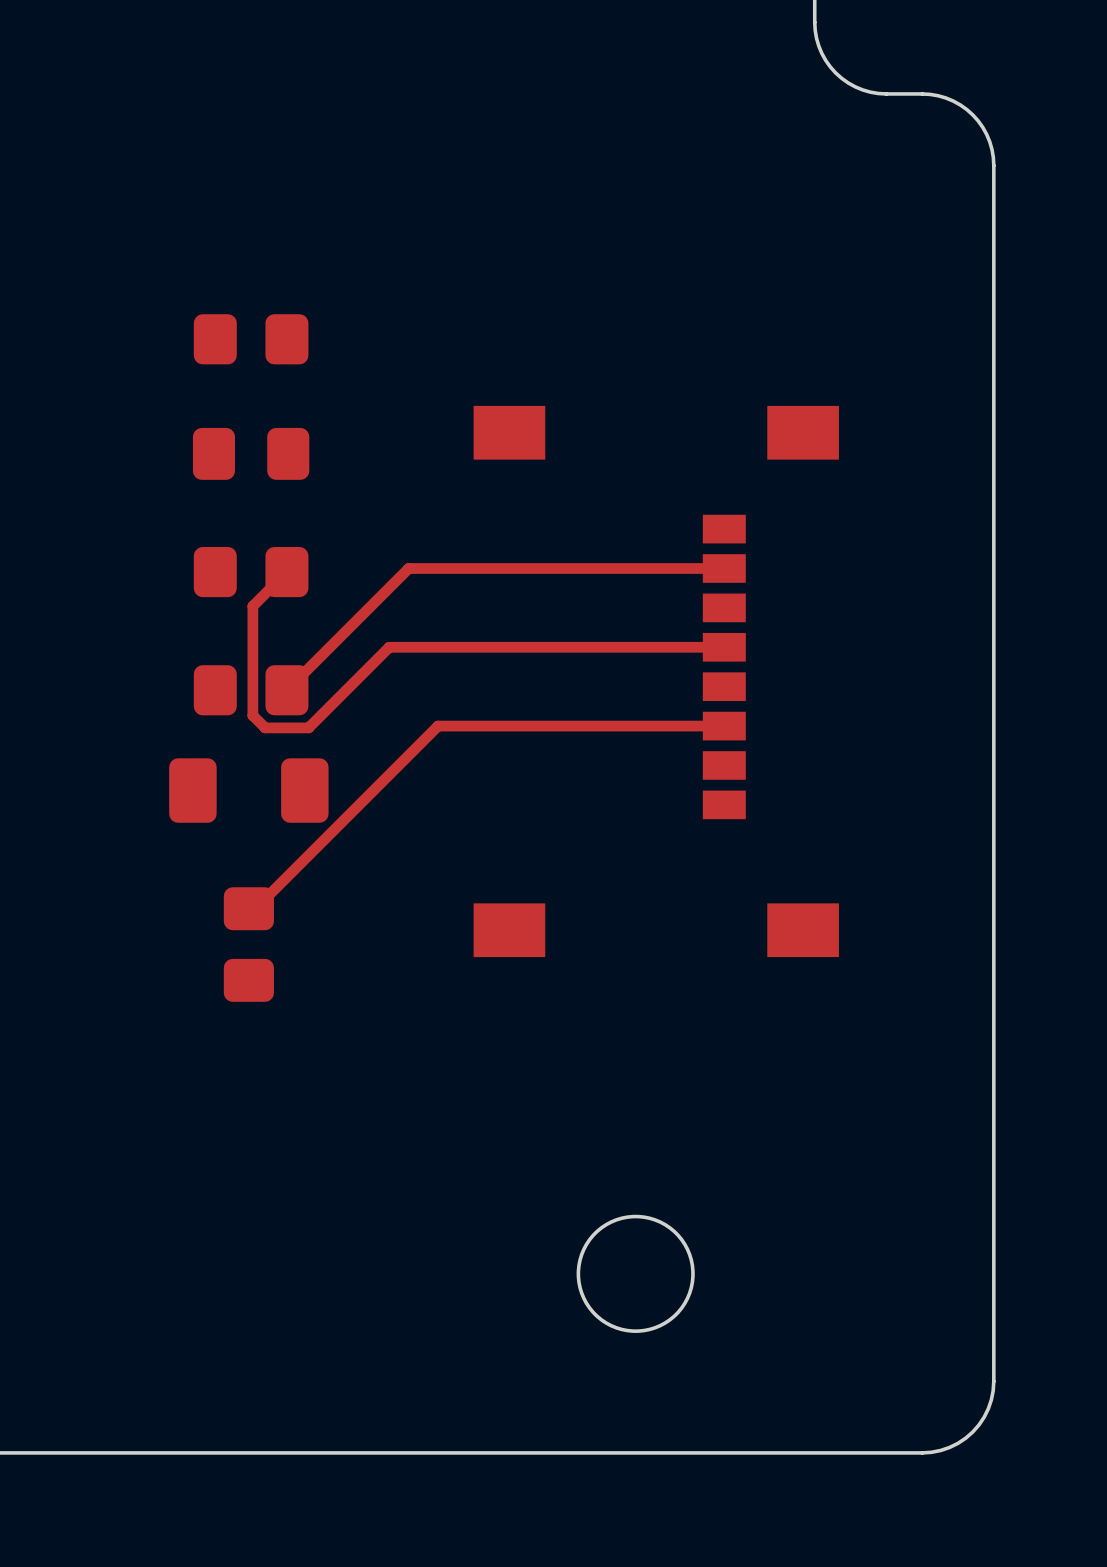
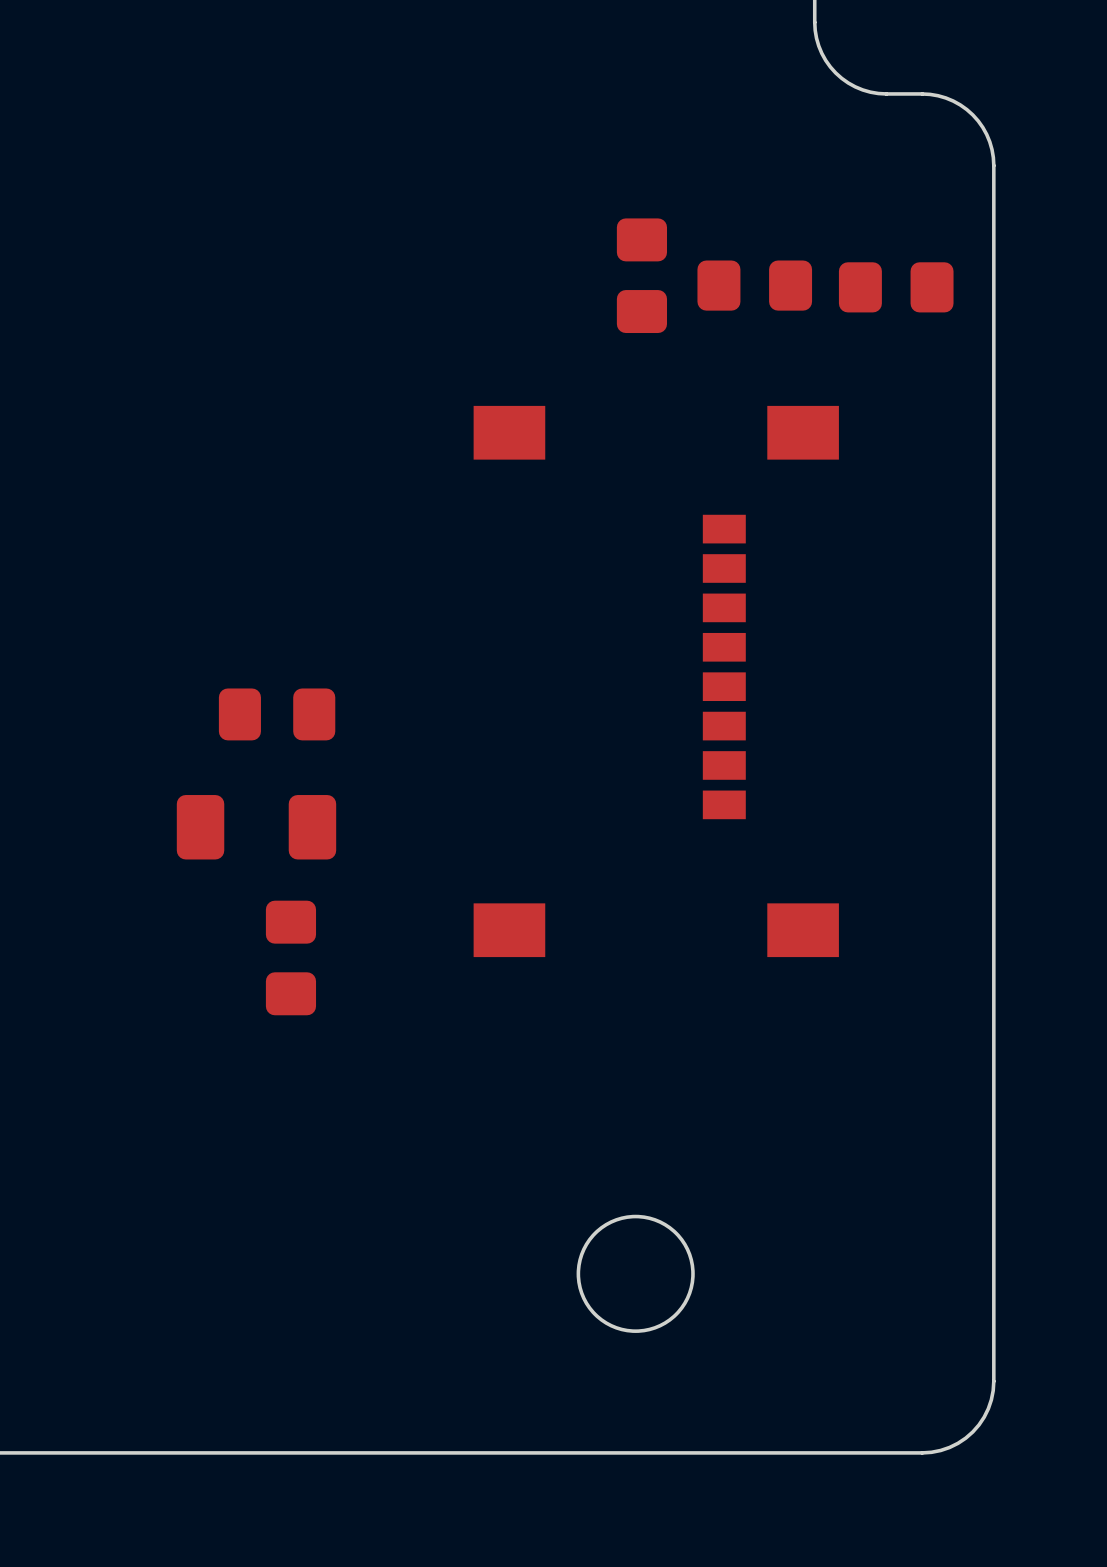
part: none -> (641, 275)
part: none -> (754, 285)
part: none -> (896, 287)
part: (251, 339) -> none
part: (251, 453) -> none
top track: (724, 568) (408, 568) (286, 690) -> none
part: (251, 572) -> none
top track: (286, 572) (252, 606) (252, 715) (265, 727) (308, 727) (389, 647) (724, 647) -> none
part footprint: [193, 665, 309, 716] -> [218, 688, 336, 741]
top track: (724, 726) (438, 726) (255, 908) (248, 908) -> none
part position: (248, 790) -> (256, 827)
part position: (248, 944) -> (290, 957)

